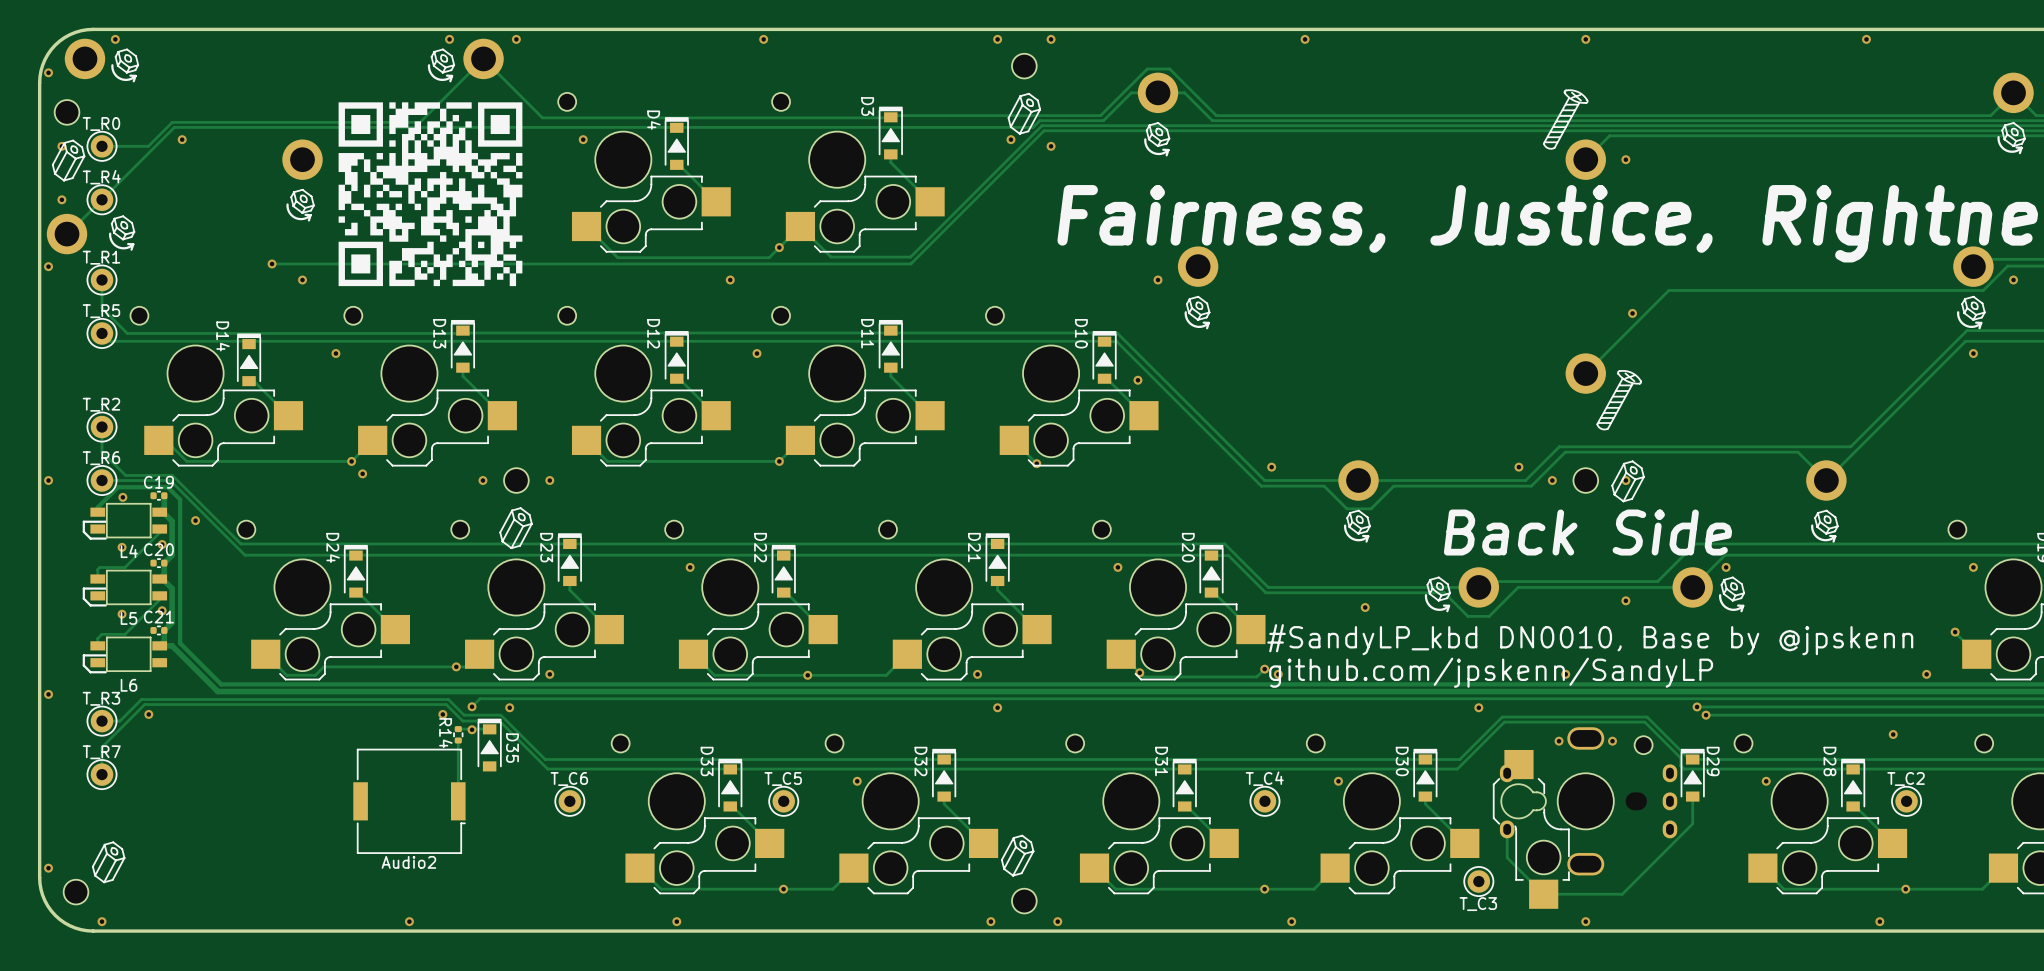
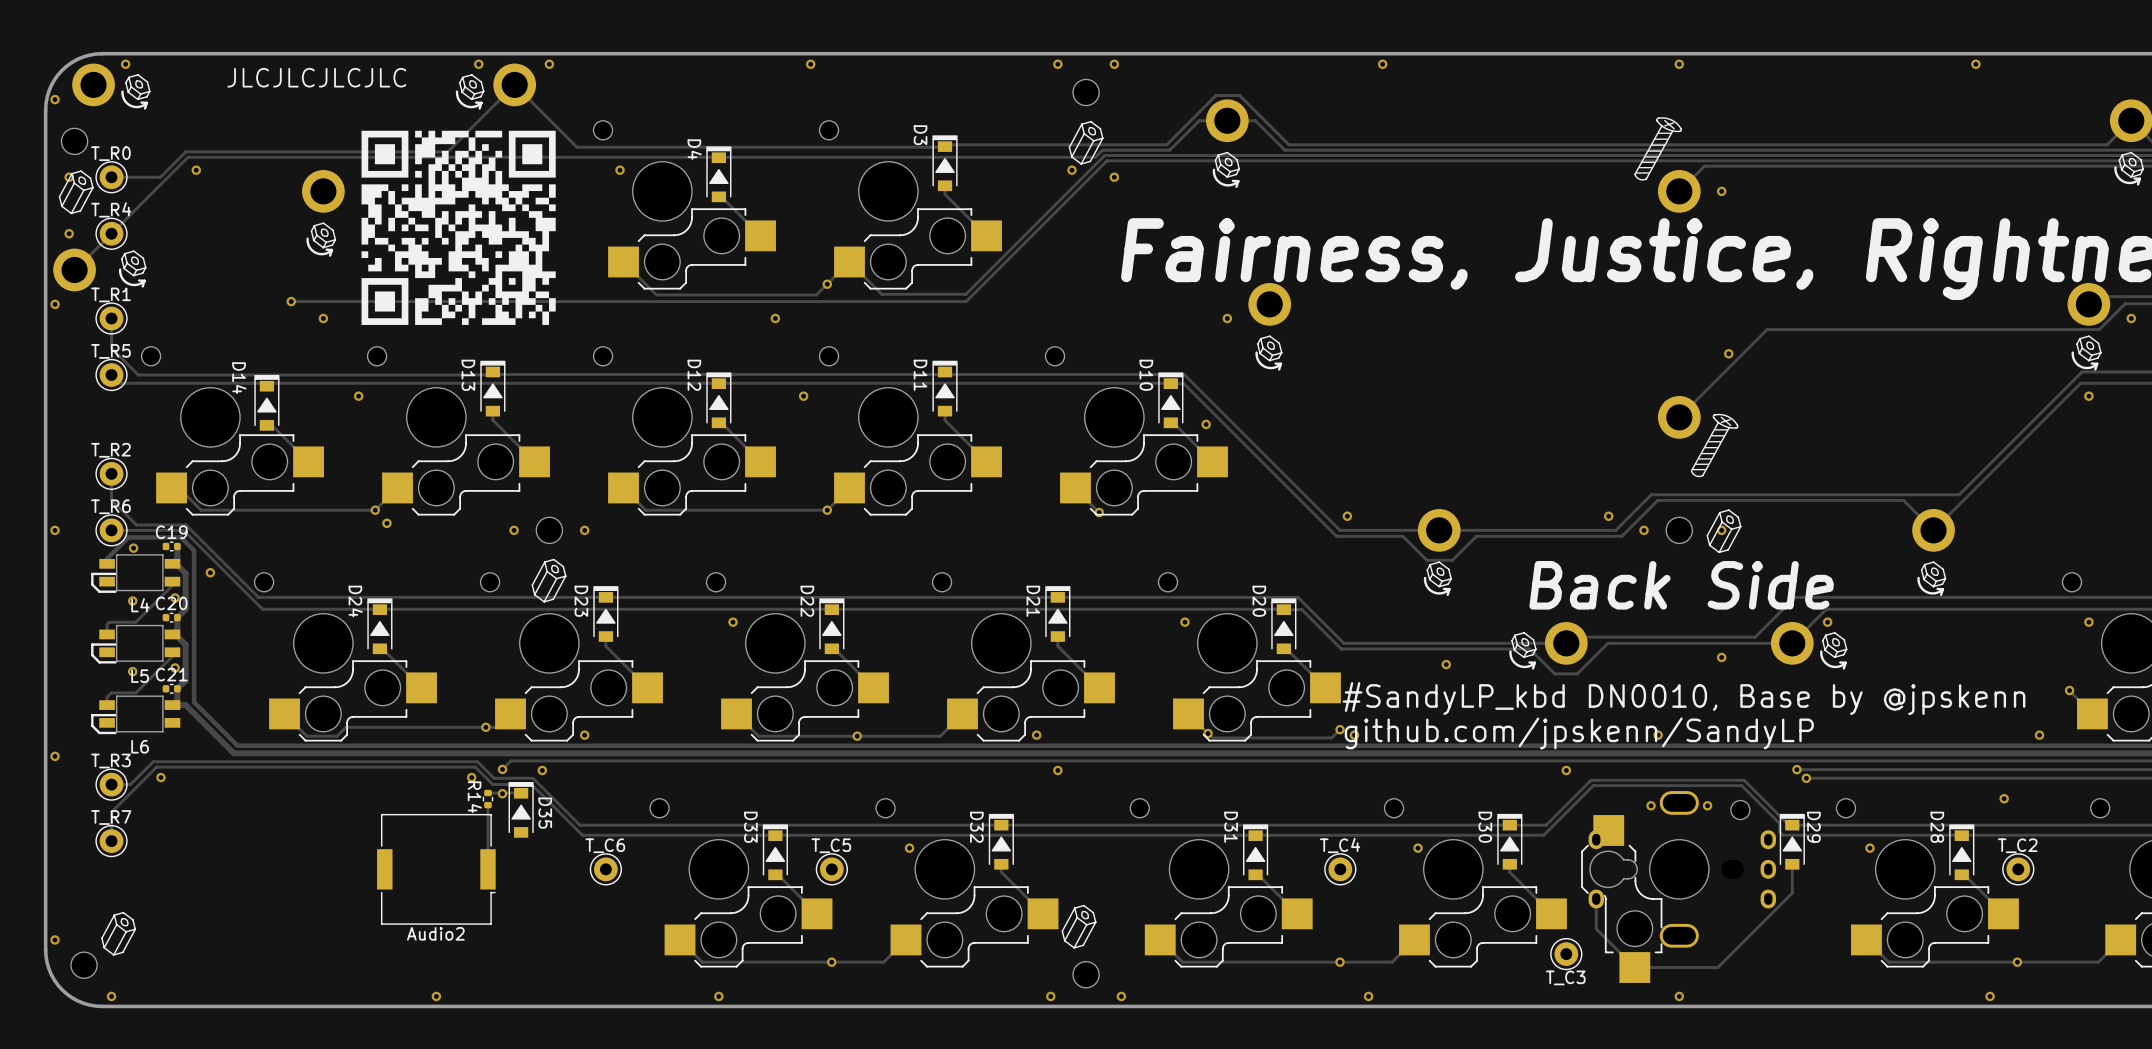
text: none -> JLCJLCJLCJLC (316, 77)

